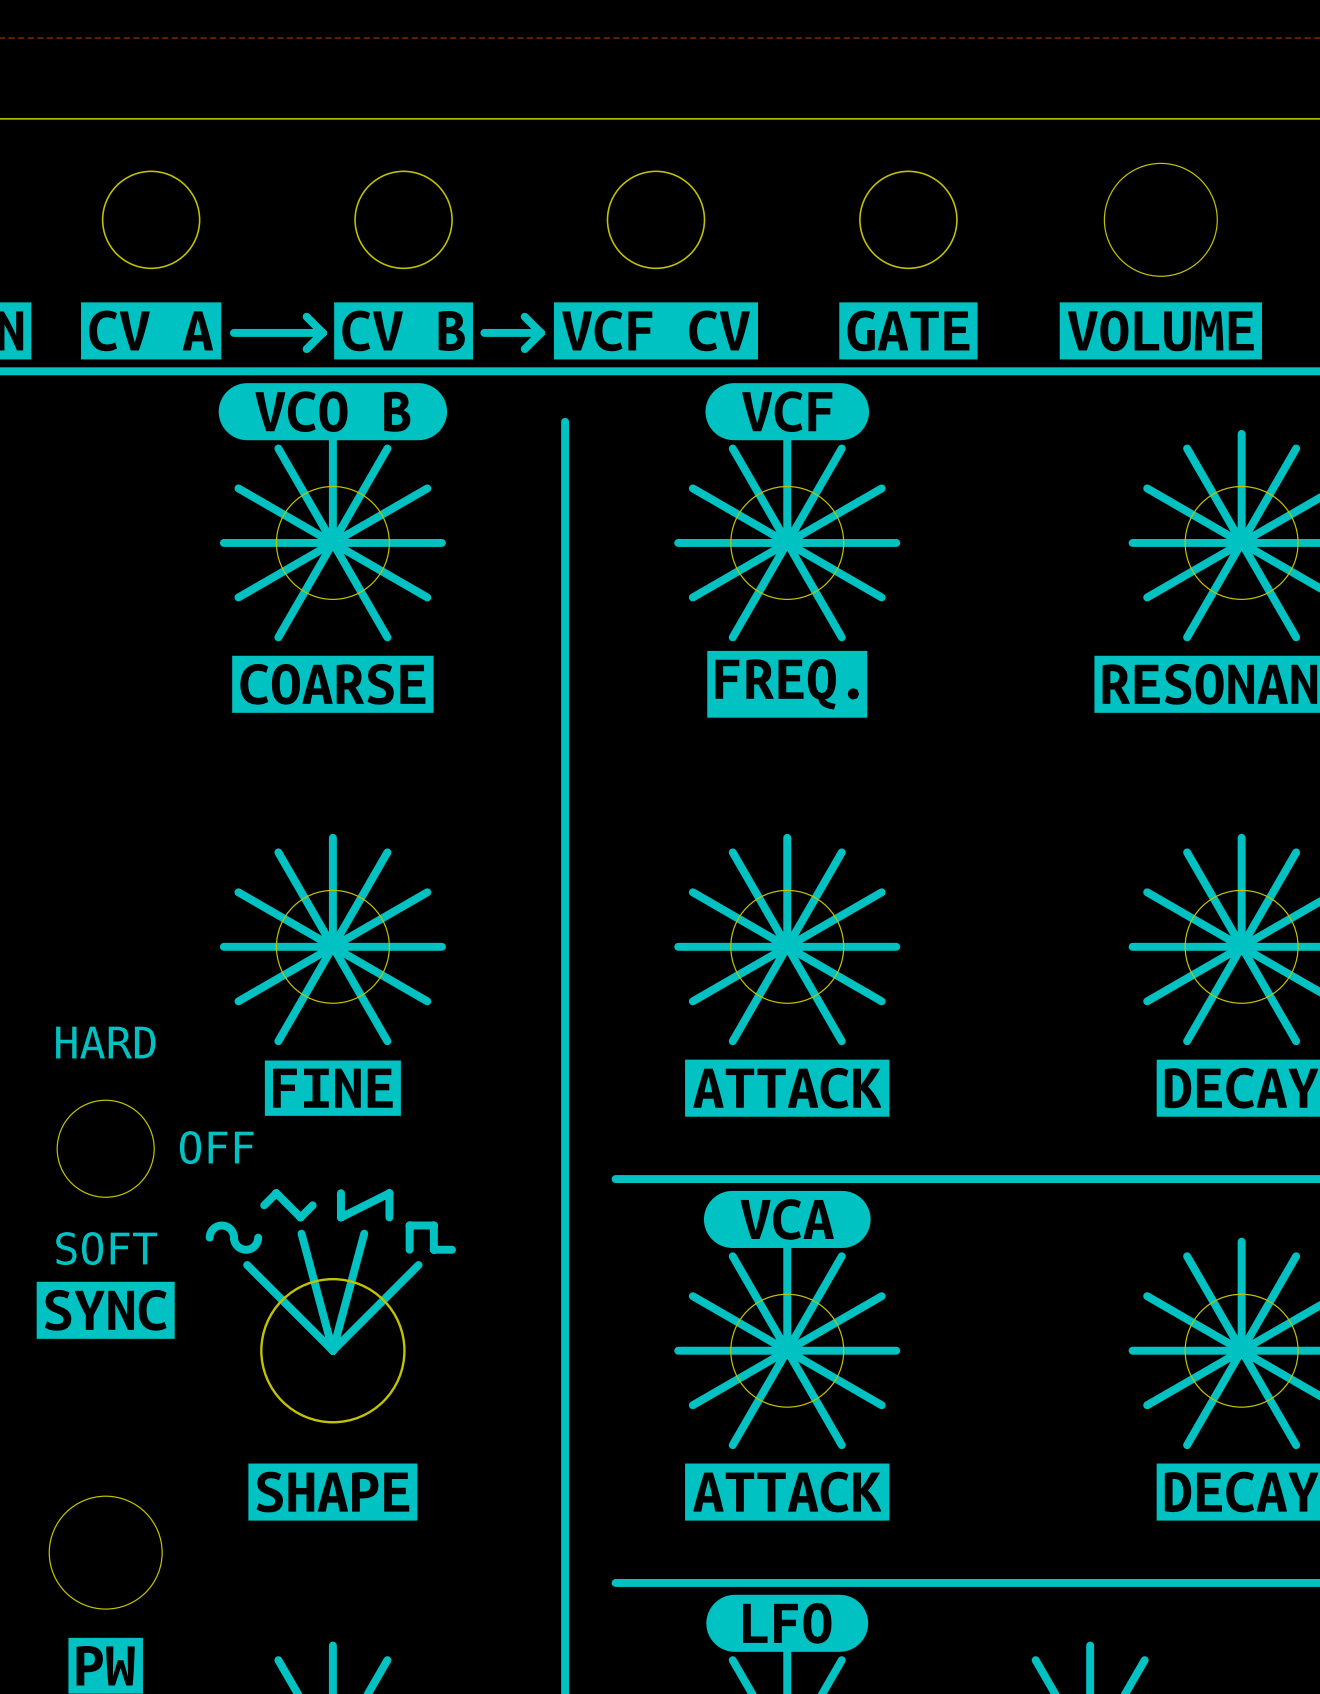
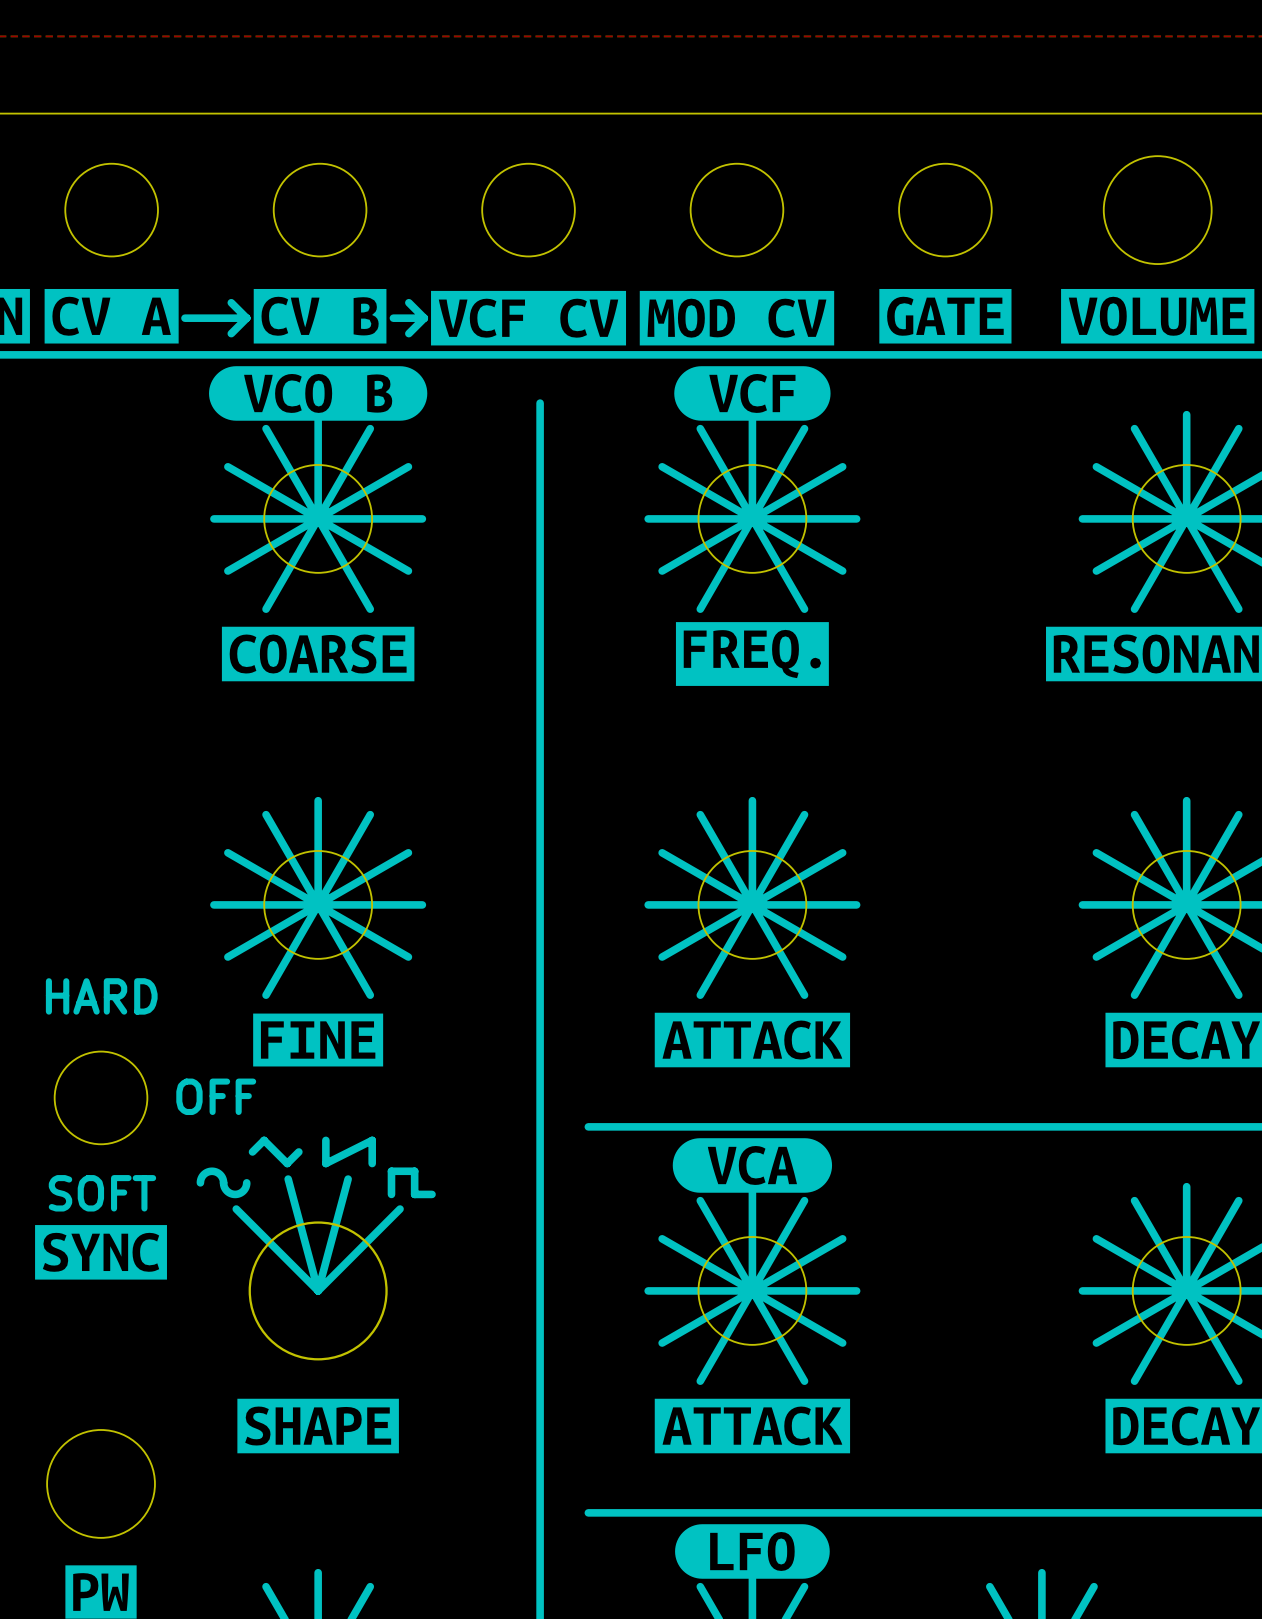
round board edge: none -> [481, 162, 576, 258]
round board edge: [606, 170, 706, 270] -> none
round board edge: none -> [689, 162, 785, 258]
round board edge: [859, 170, 958, 270] -> none
round board edge: none -> [898, 162, 993, 258]
round board edge position: (151, 219) -> (111, 210)
round board edge position: (403, 219) -> (320, 210)
round board edge position: (1160, 219) -> (1157, 210)
drawing: none -> [639, 290, 835, 346]
line: none -> (231, 302) (246, 318) (231, 333)
line: (306, 316) (322, 332) -> none
line: (524, 316) (540, 332) -> (408, 302) (424, 318)
drawing position: (151, 330) -> (111, 316)
drawing position: (403, 330) -> (320, 316)
drawing position: (655, 330) -> (528, 318)
drawing position: (908, 330) -> (945, 316)
drawing position: (1160, 330) -> (1157, 316)
line: none -> (184, 318) (223, 318)
line: (258, 332) (322, 332) -> none
line: (322, 332) (306, 349) -> none
line: none -> (393, 318) (424, 318)
line: (484, 332) (540, 332) -> none
line: (540, 332) (524, 349) -> (424, 318) (408, 333)

